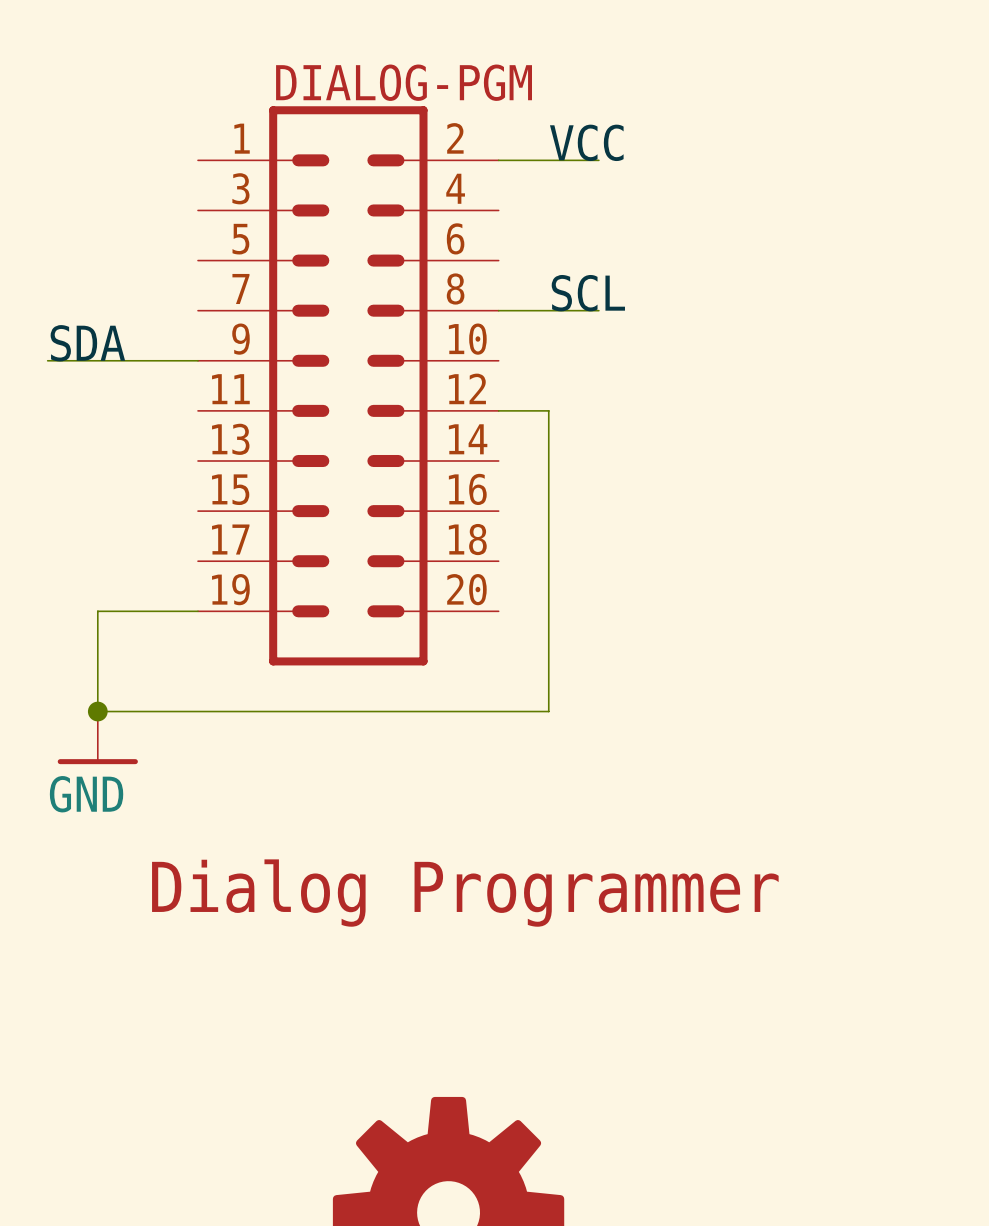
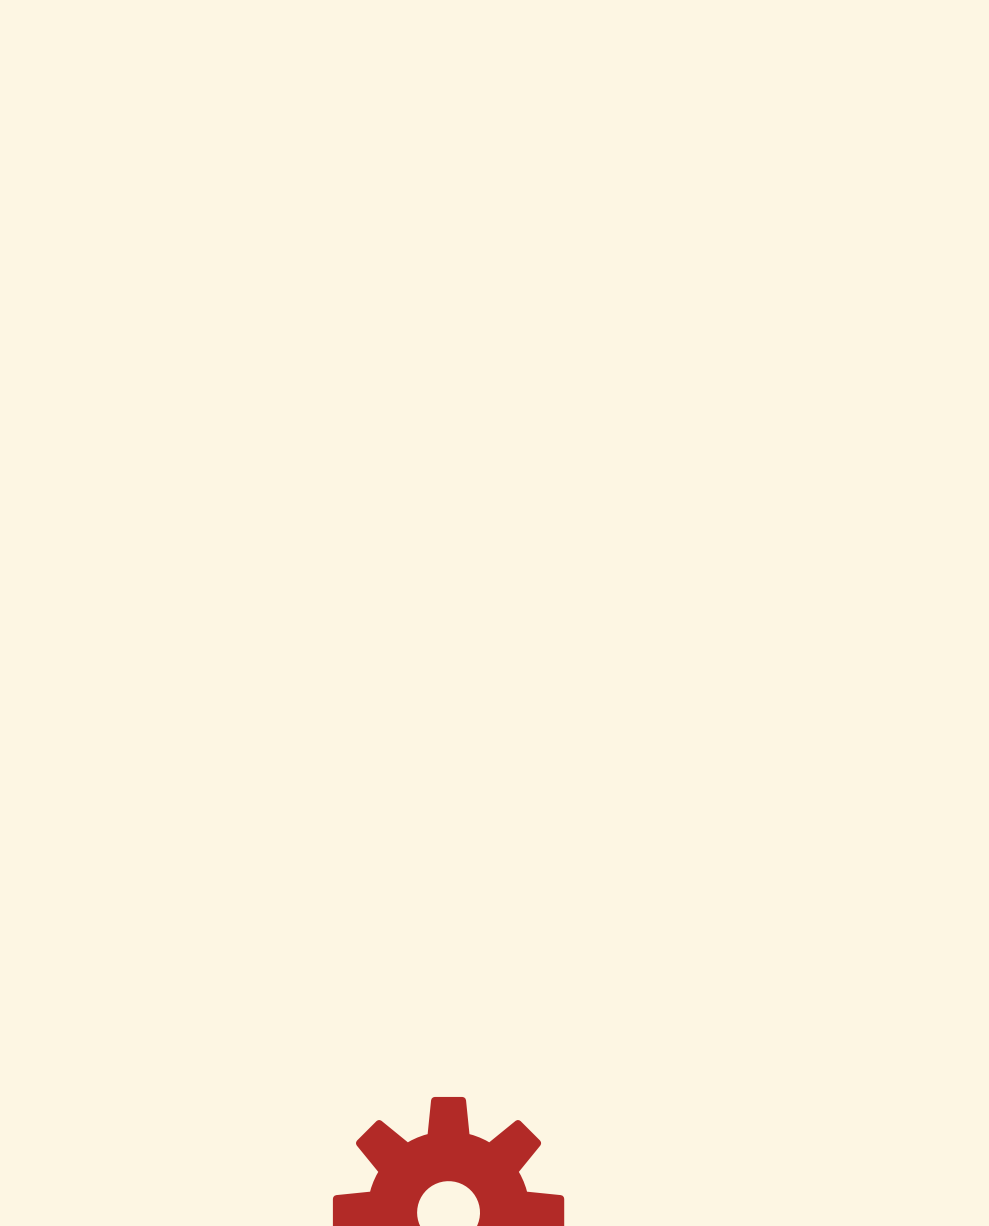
label: VCC (586, 142) -> none
wire: (498, 160) (598, 160) -> none
label: SCL (588, 293) -> none
wire: (498, 310) (598, 310) -> none
label: SDA (87, 343) -> none
wire: (47, 360) (198, 360) -> none
DIALOG-PGM: (348, 385) -> none
wire: (498, 410) (548, 410) (548, 711) (97, 711) (97, 611) (198, 611) -> none
junction: (97, 711) -> none
power symbol: GND (97, 737) -> none
text: Dialog Programmer (465, 893) -> none

